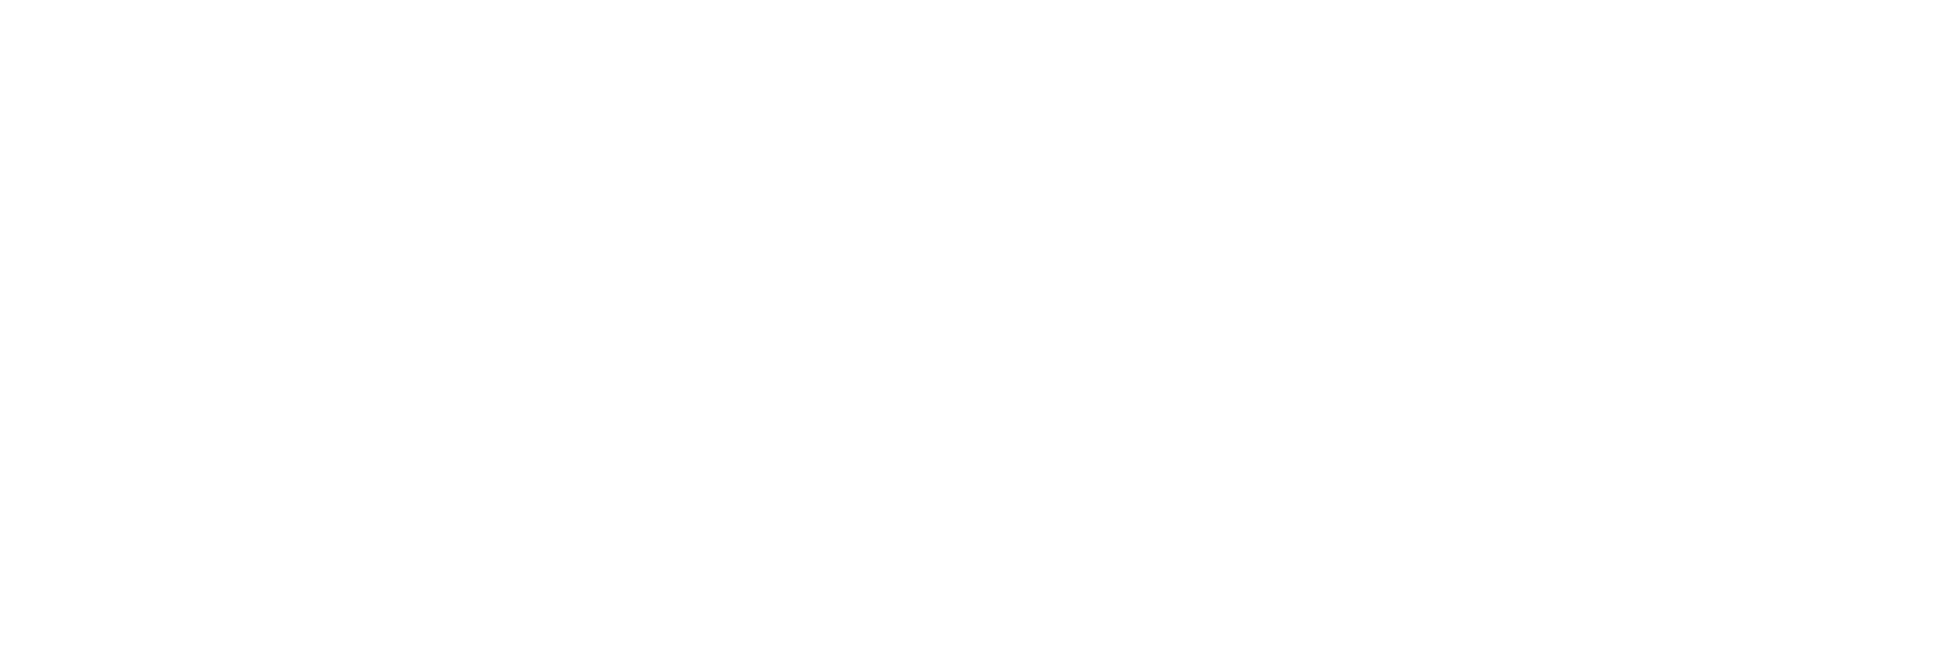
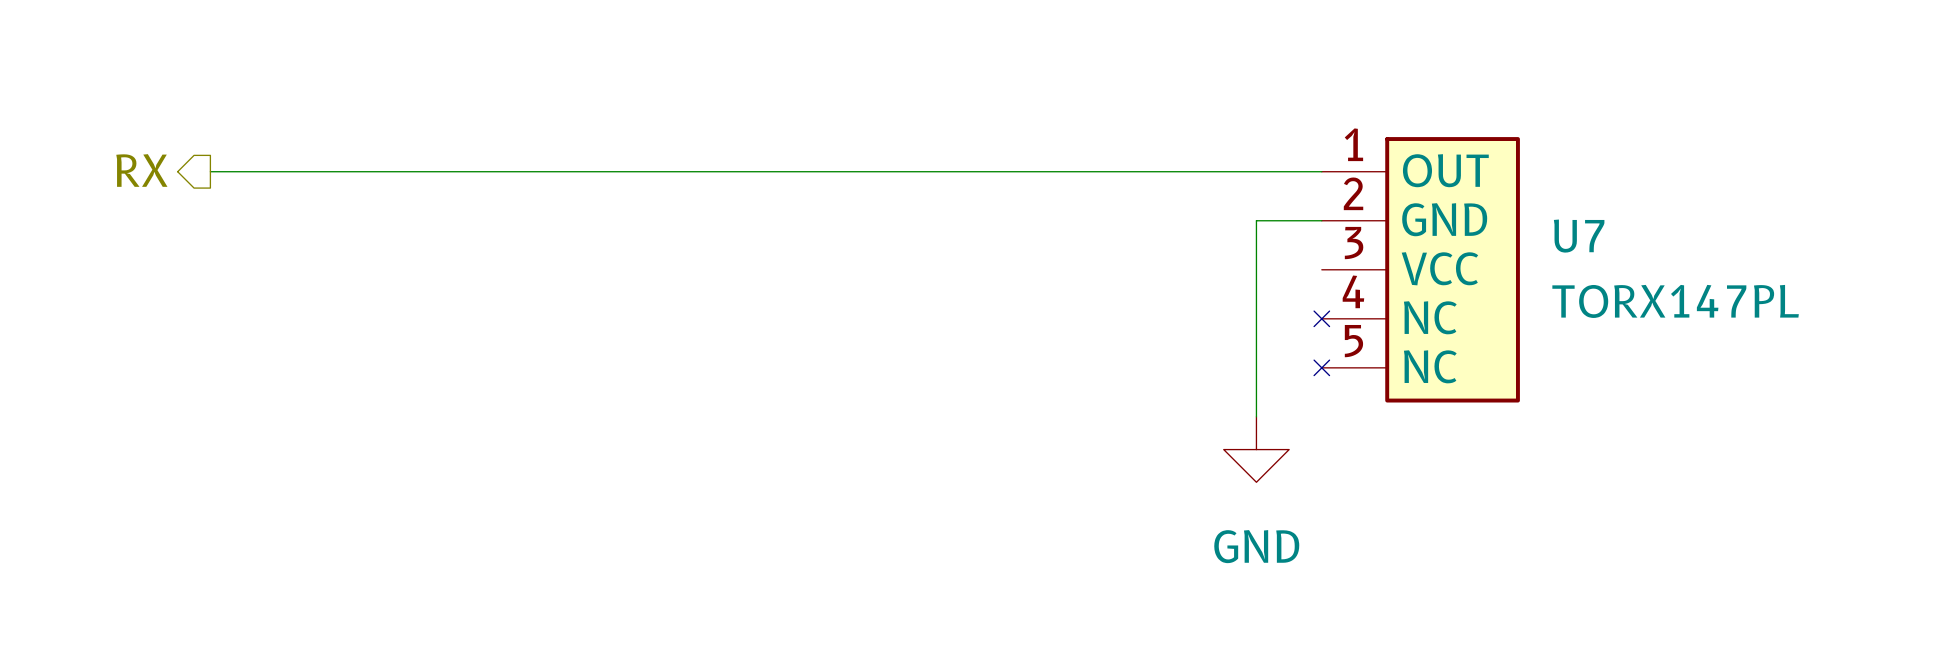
hierarchical label: none -> RX (141, 170)
wire: none -> (210, 171) (1321, 171)
wire: none -> (1321, 220) (1256, 220) (1256, 416)
U7: none -> TORX147PL (1417, 269)
power symbol: none -> GND (1256, 449)

